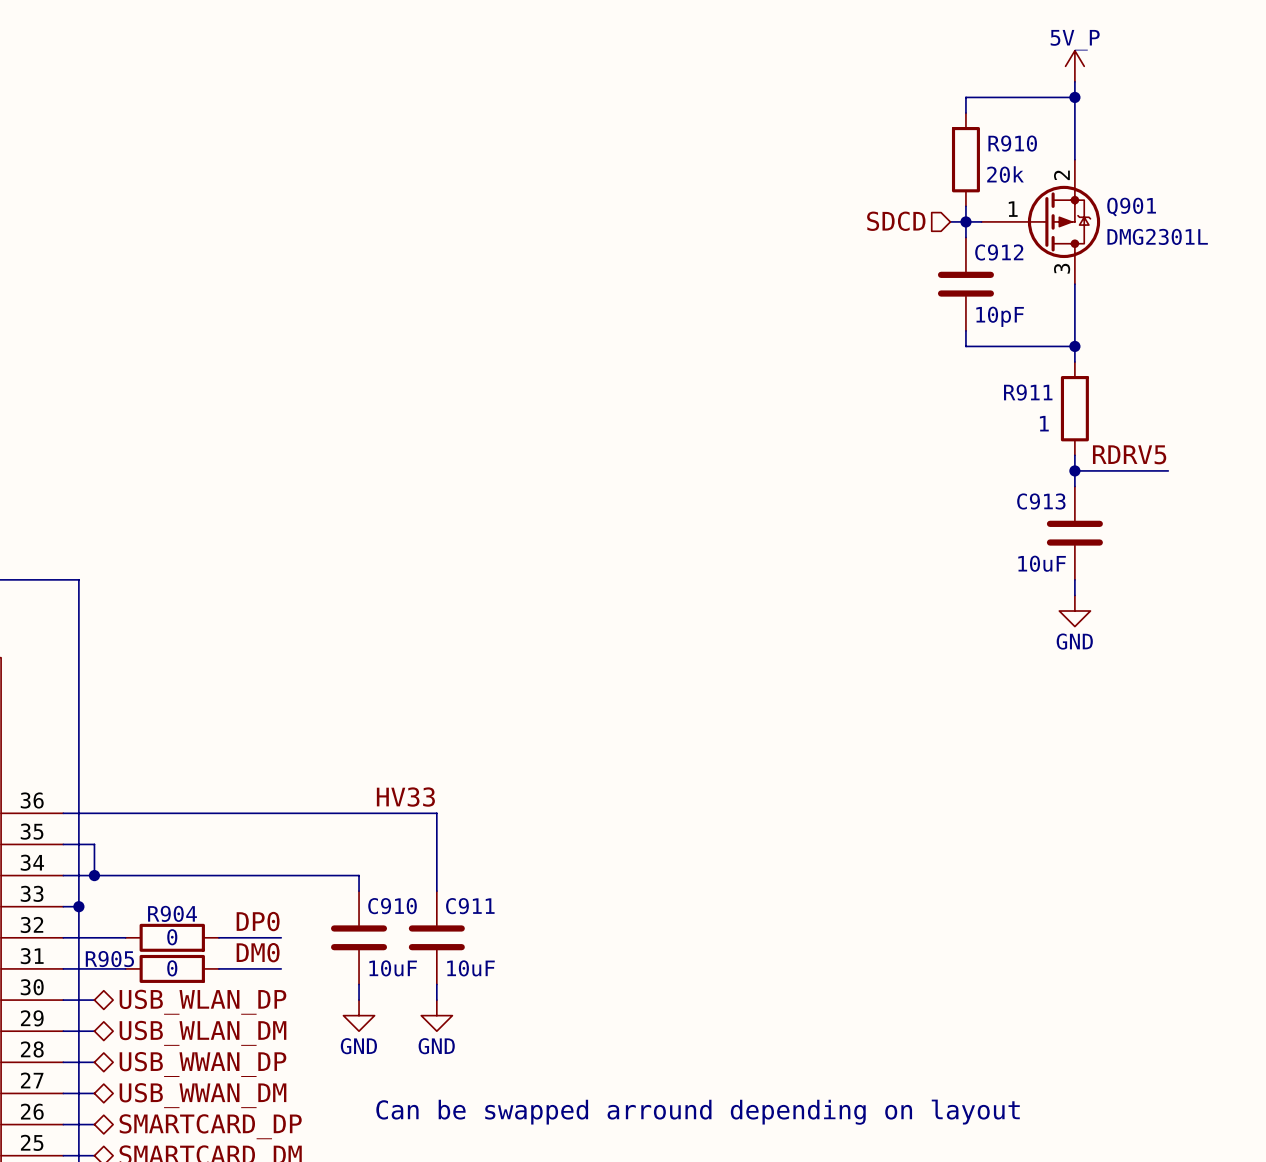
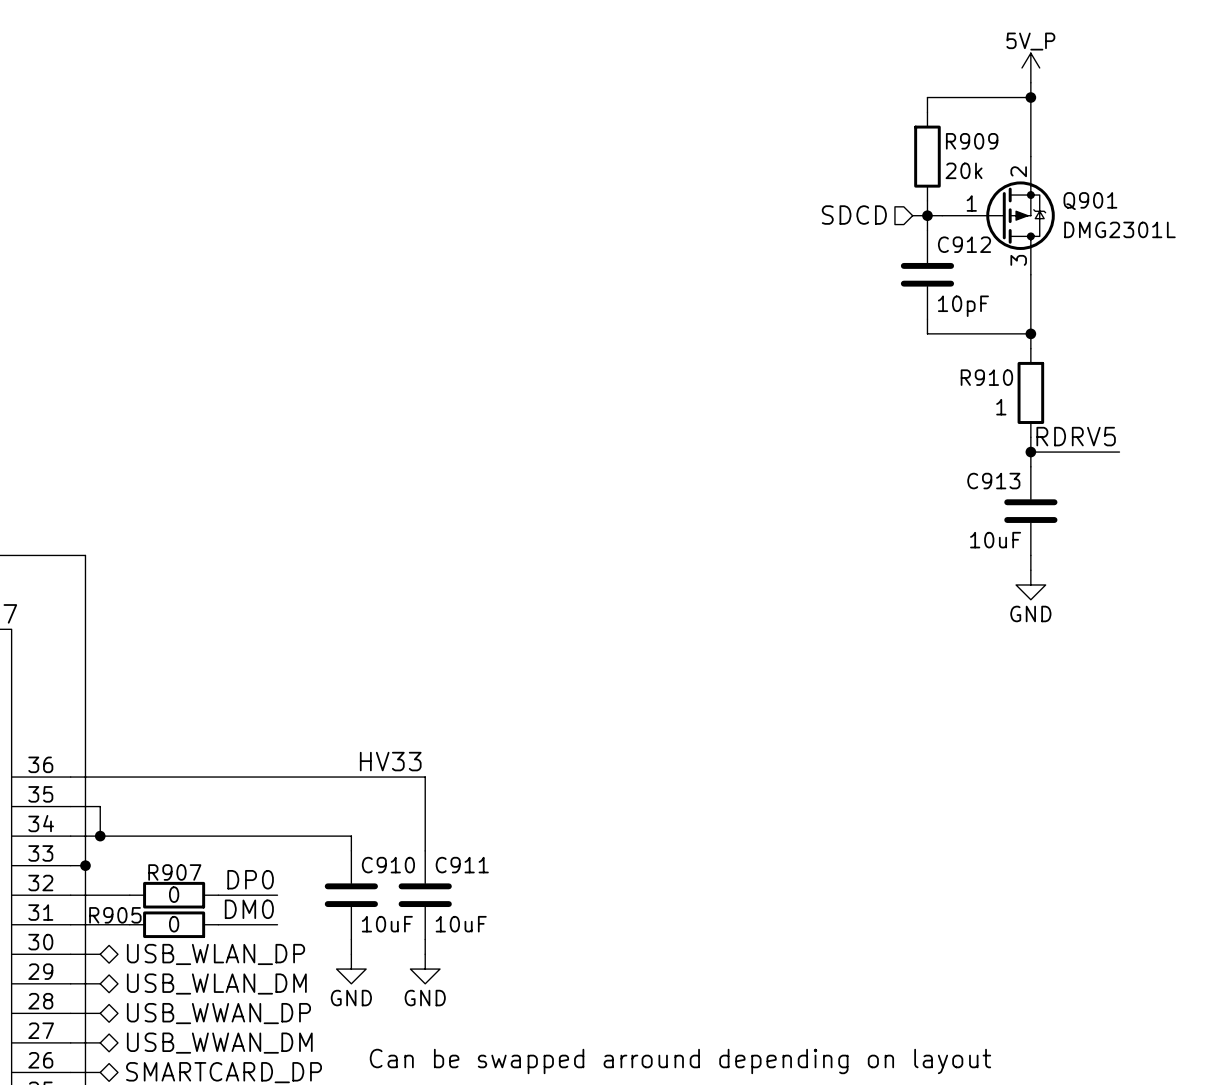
R910 name: R910 (1012, 143) -> R909 (972, 141)
R911 name: R911 (1028, 392) -> R910 (986, 377)
R904 name: R904 (172, 913) -> R907 (174, 872)

